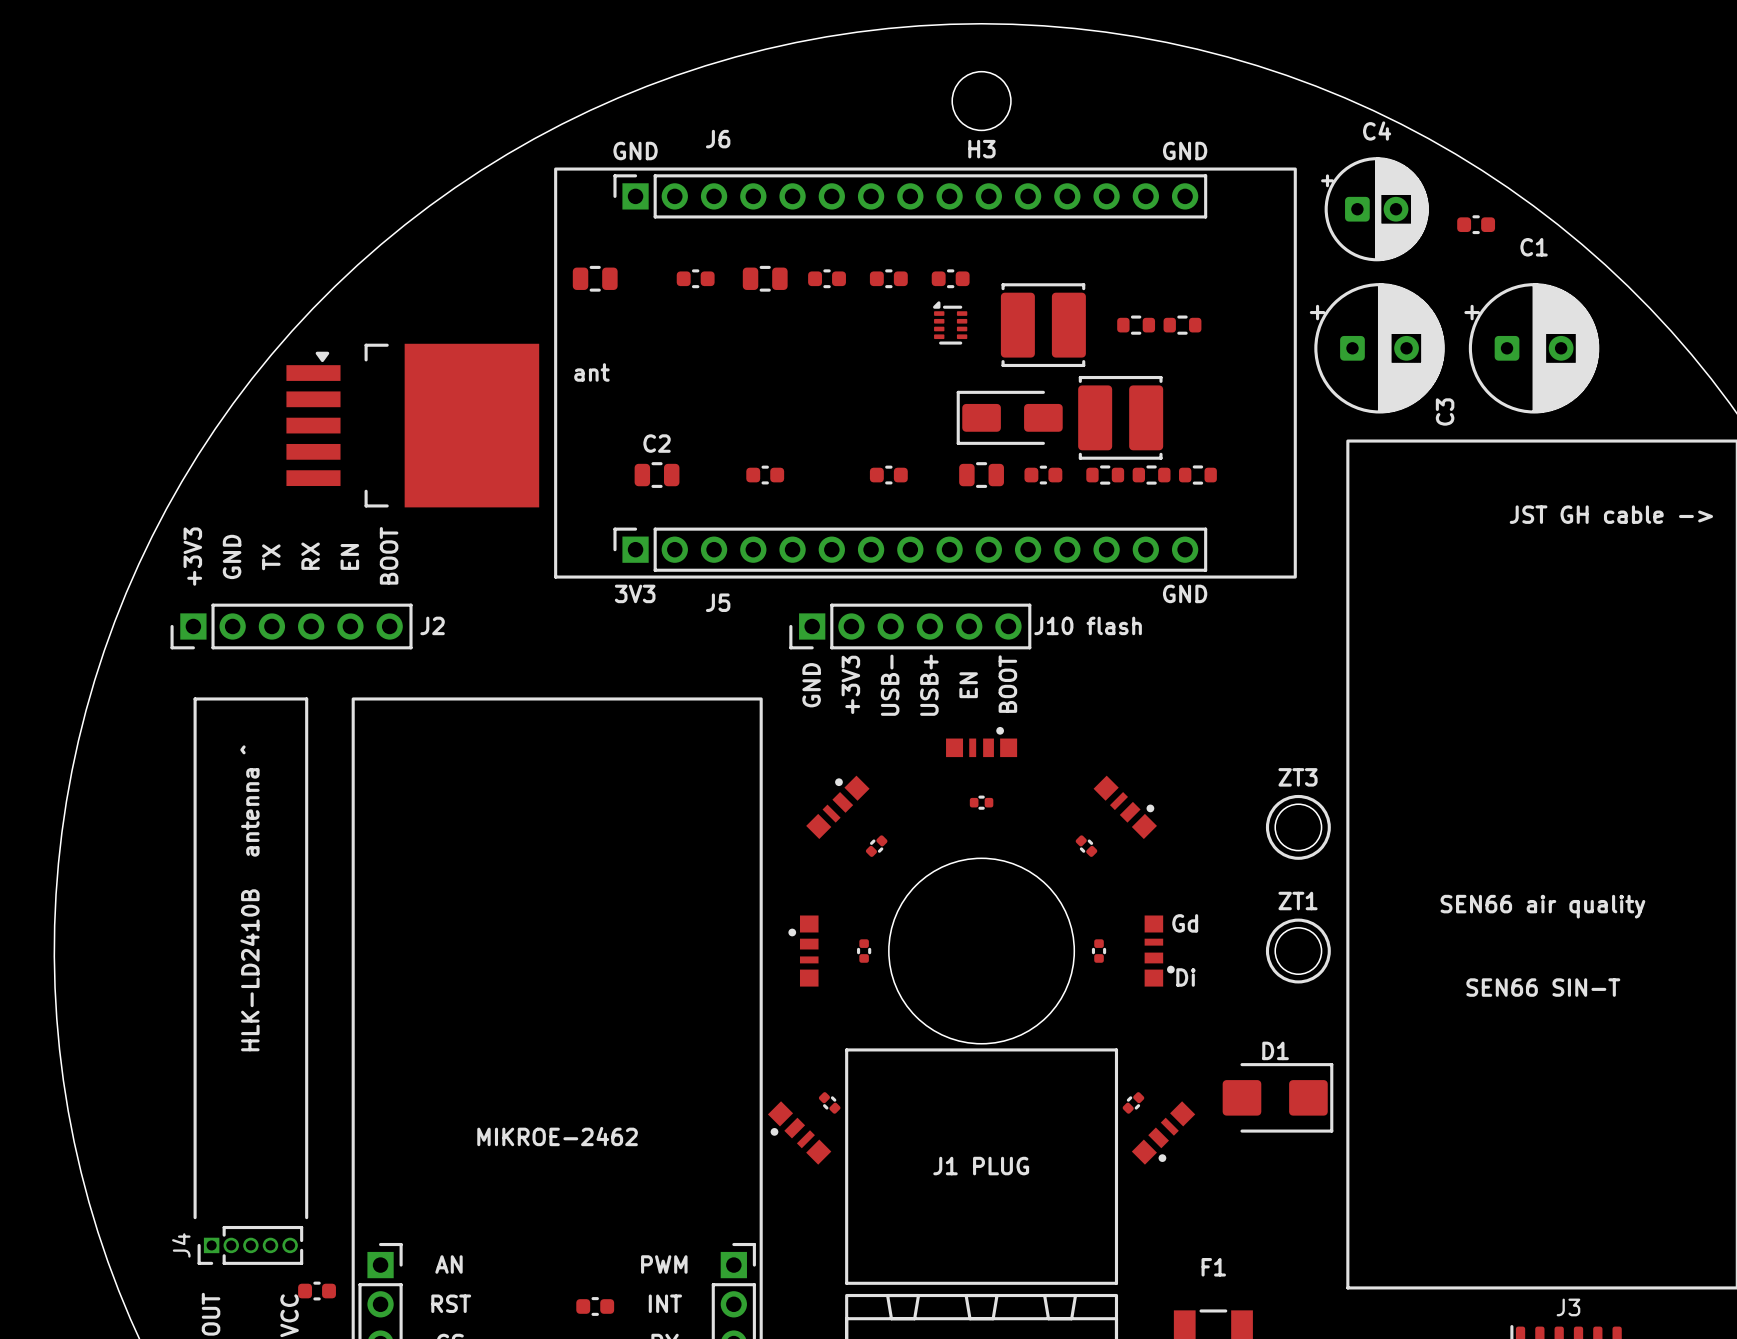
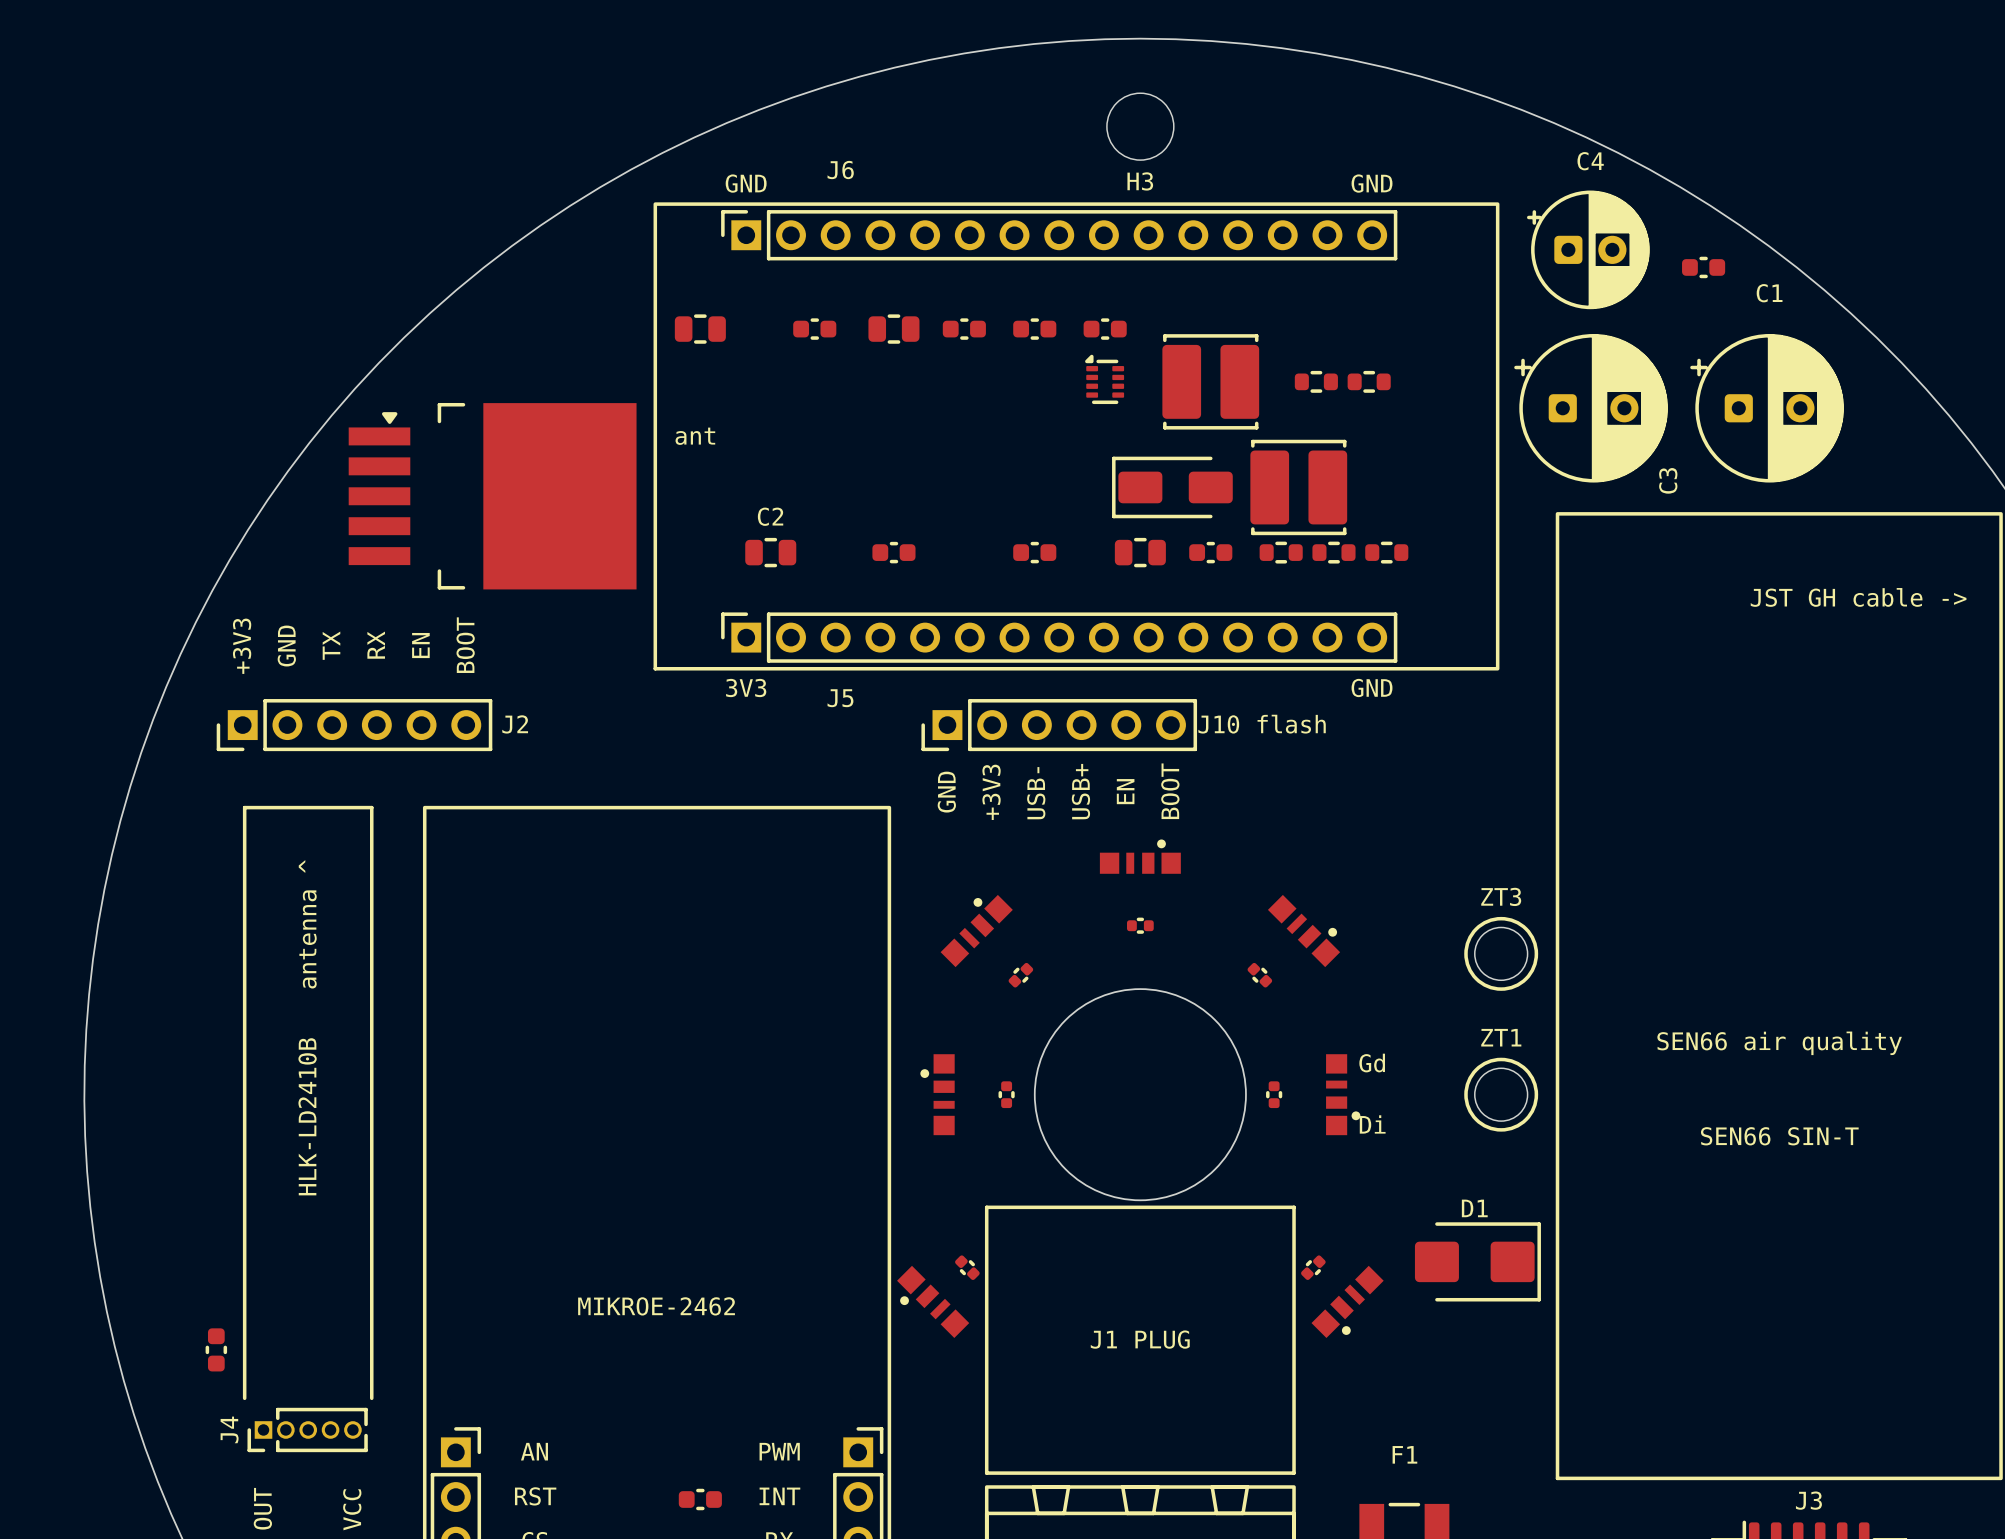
part rotation: 0° (317, 1291) -> 90° clockwise (216, 1349)
part position: (317, 1291) -> (216, 1349)

